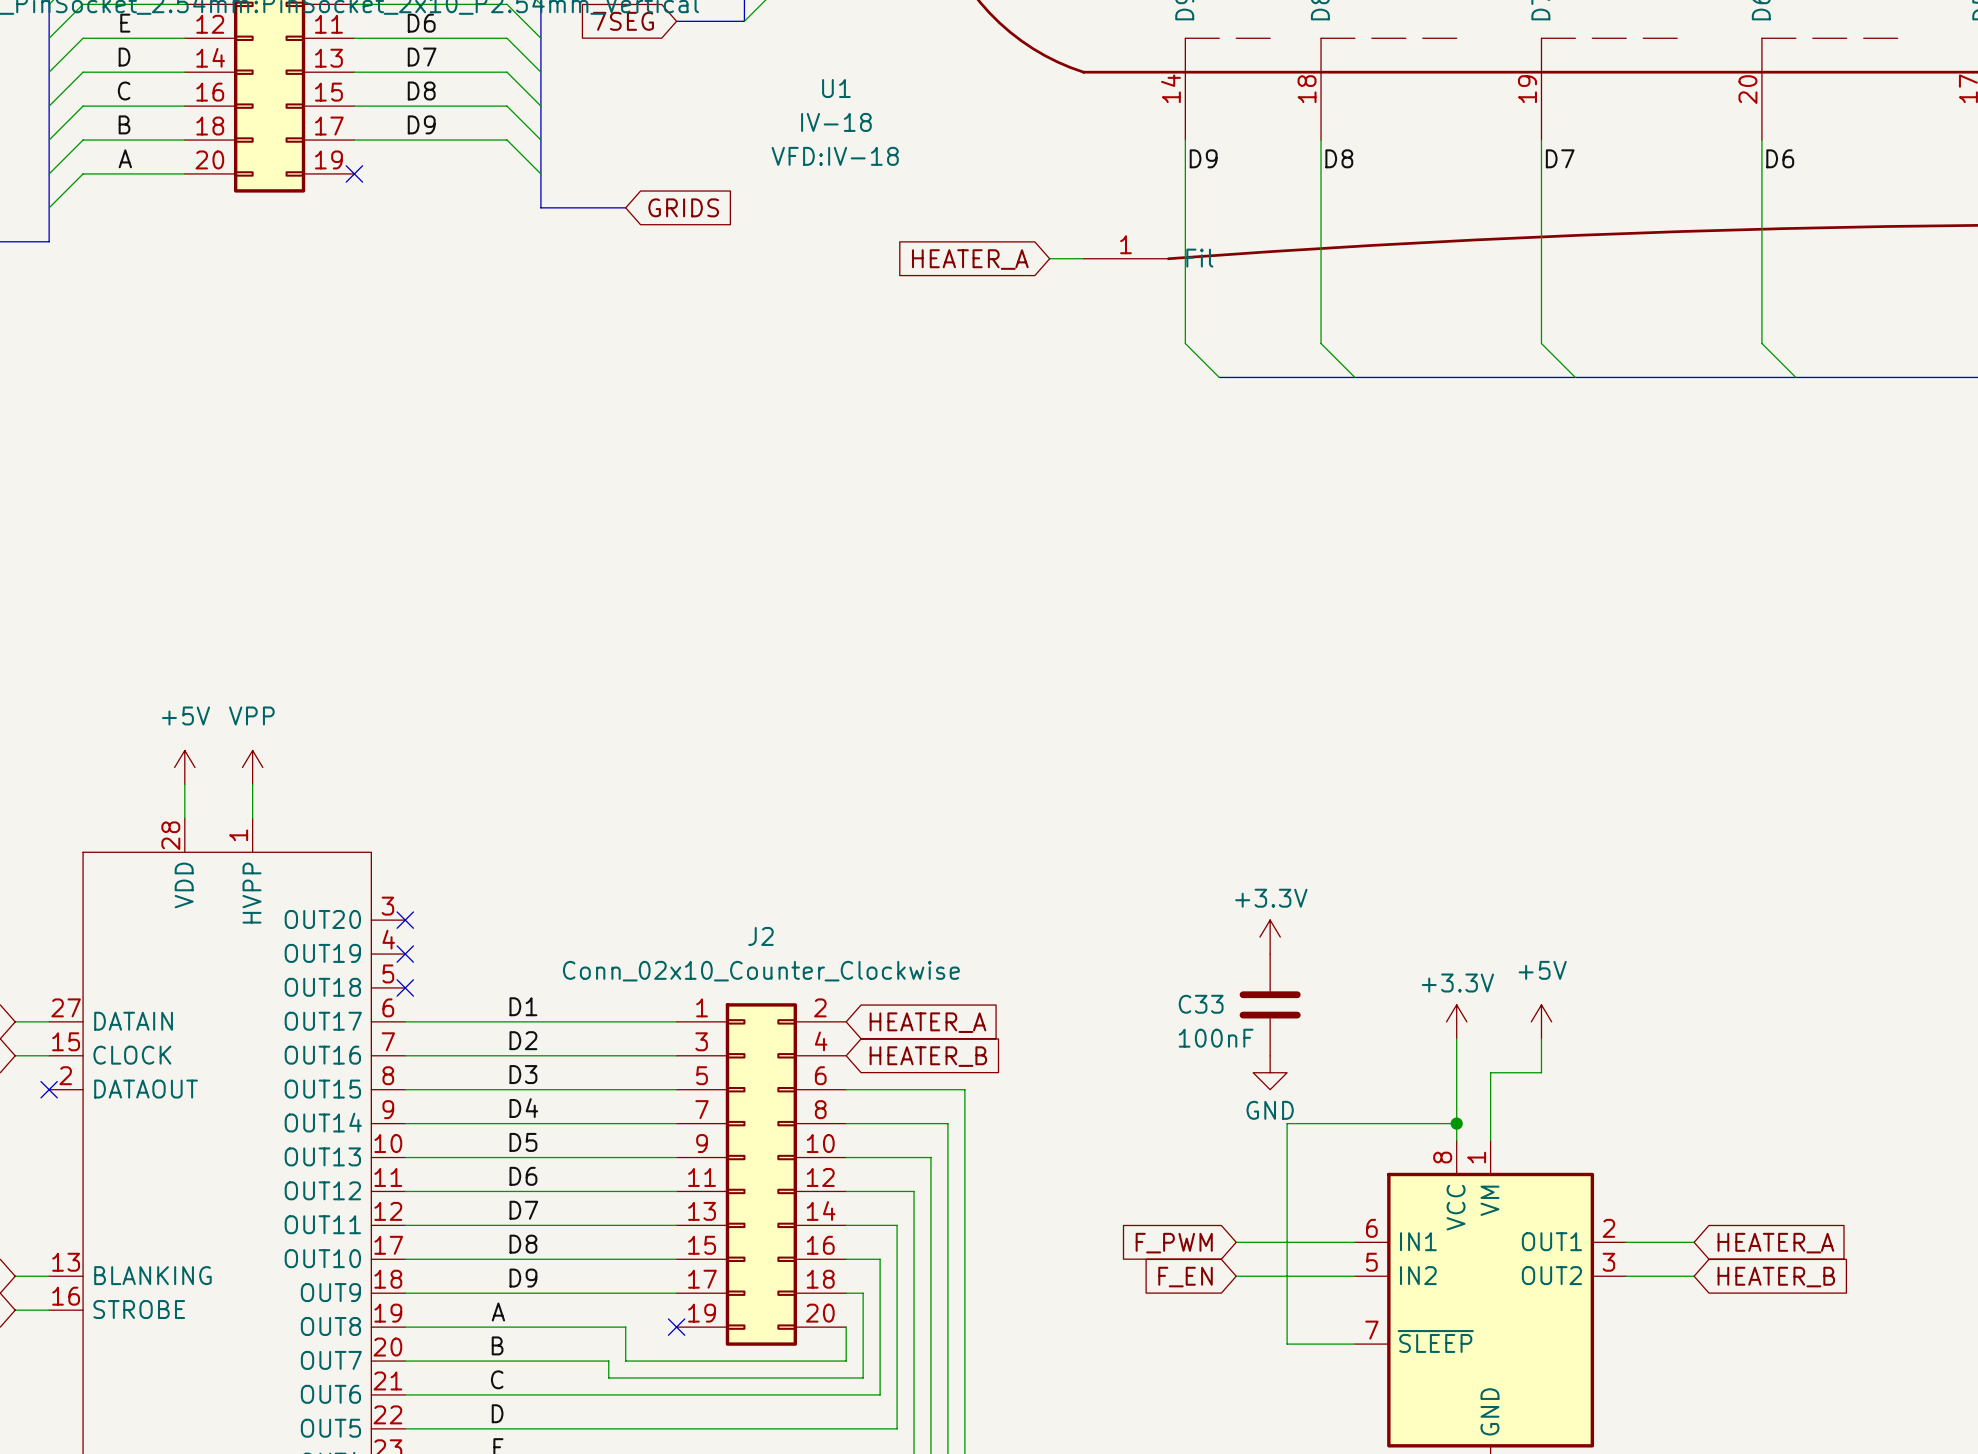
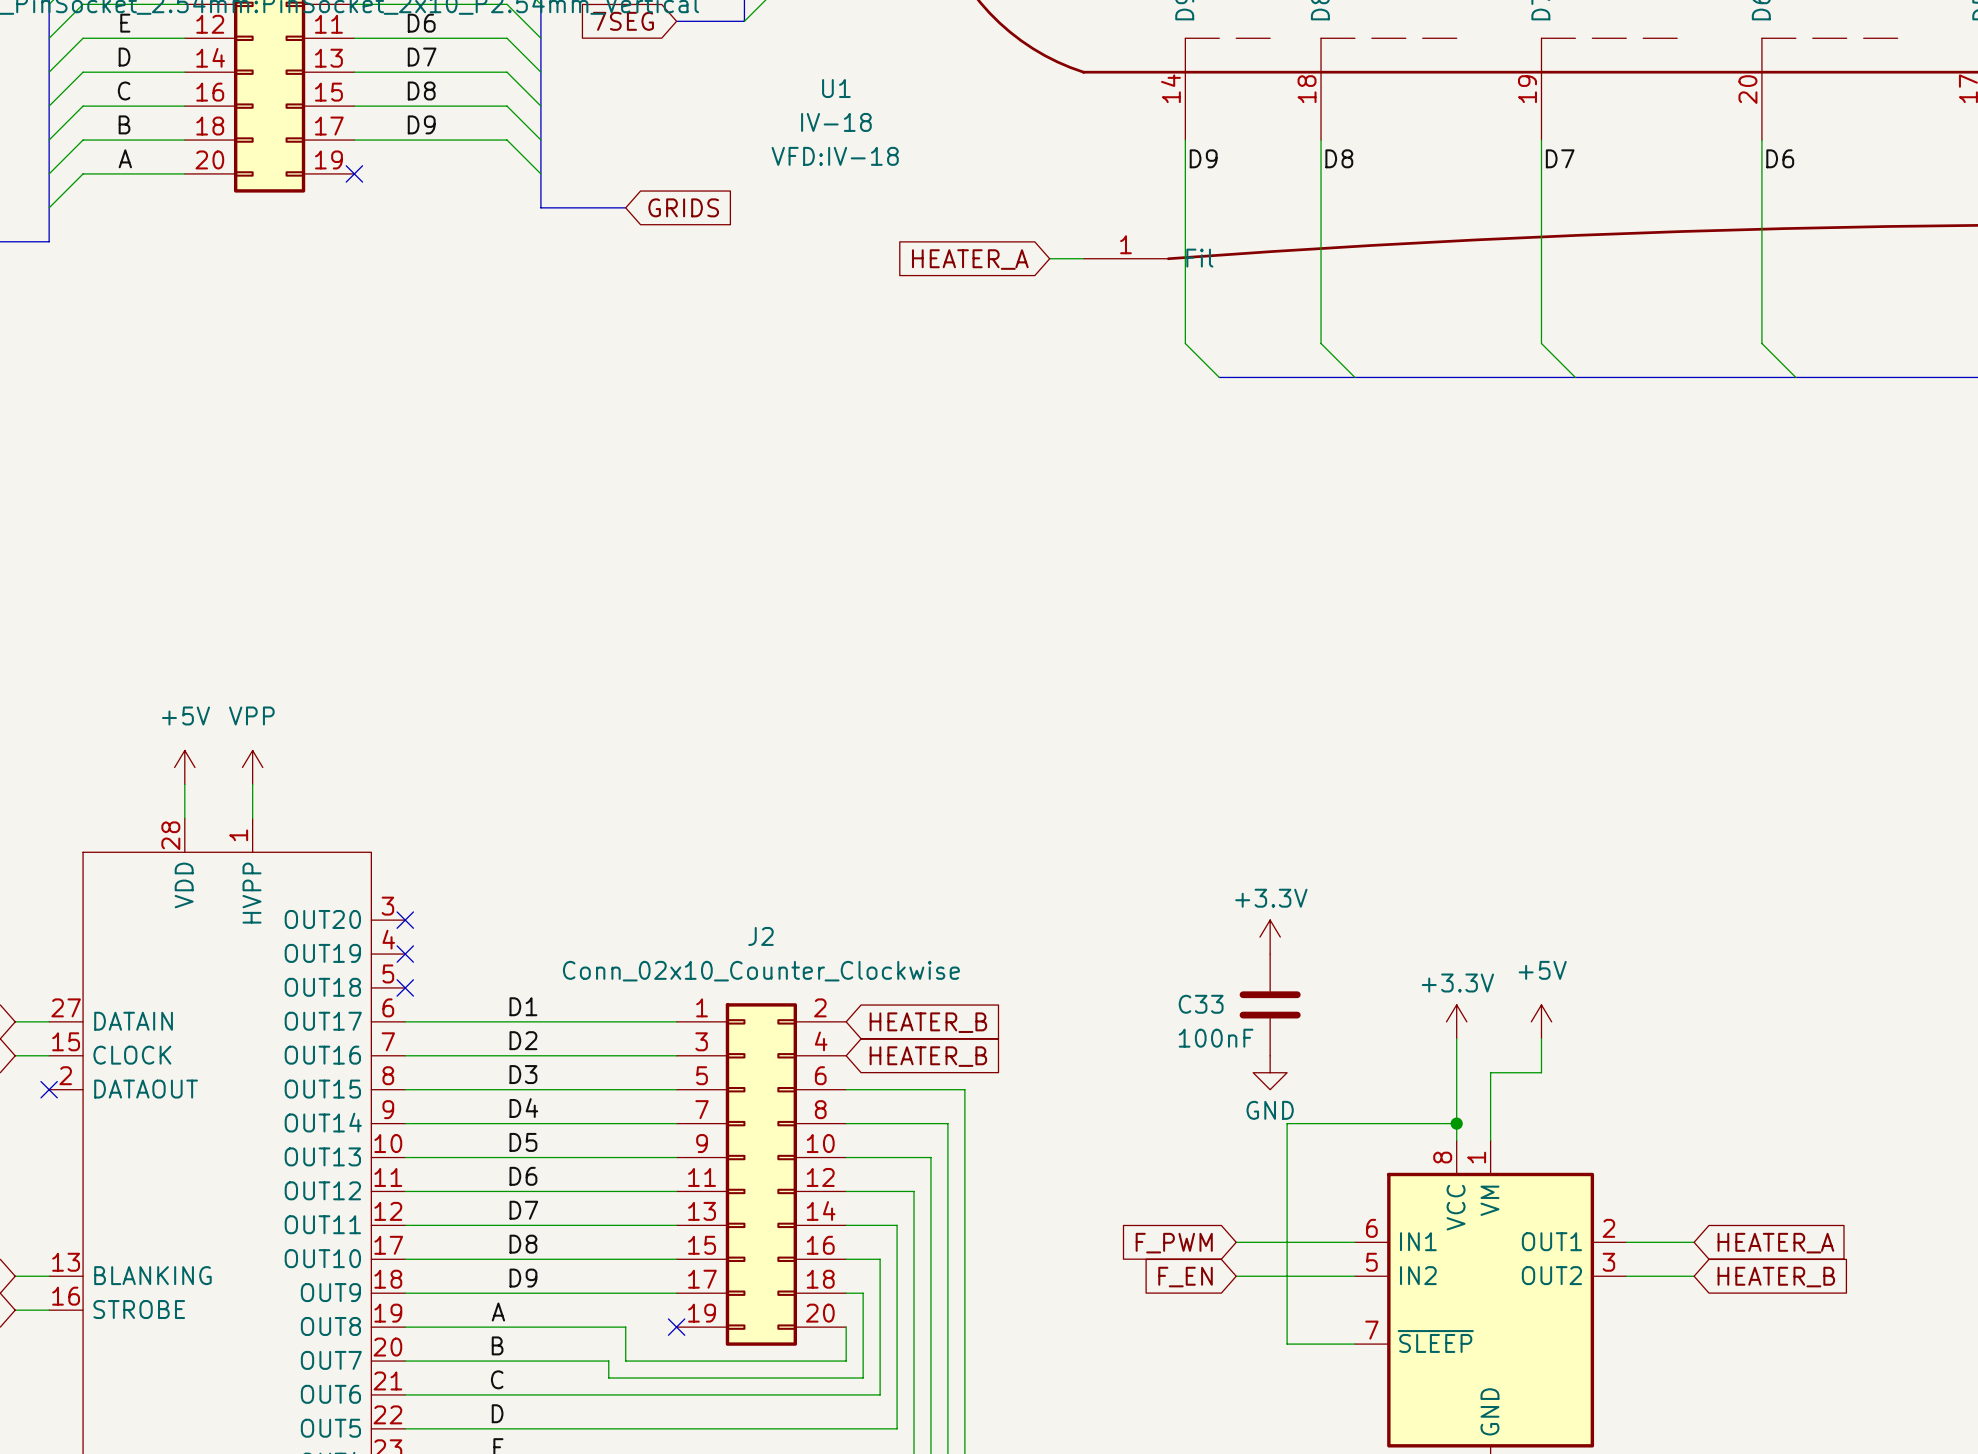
global label: HEATER_A (927, 1022) -> HEATER_B (928, 1022)

